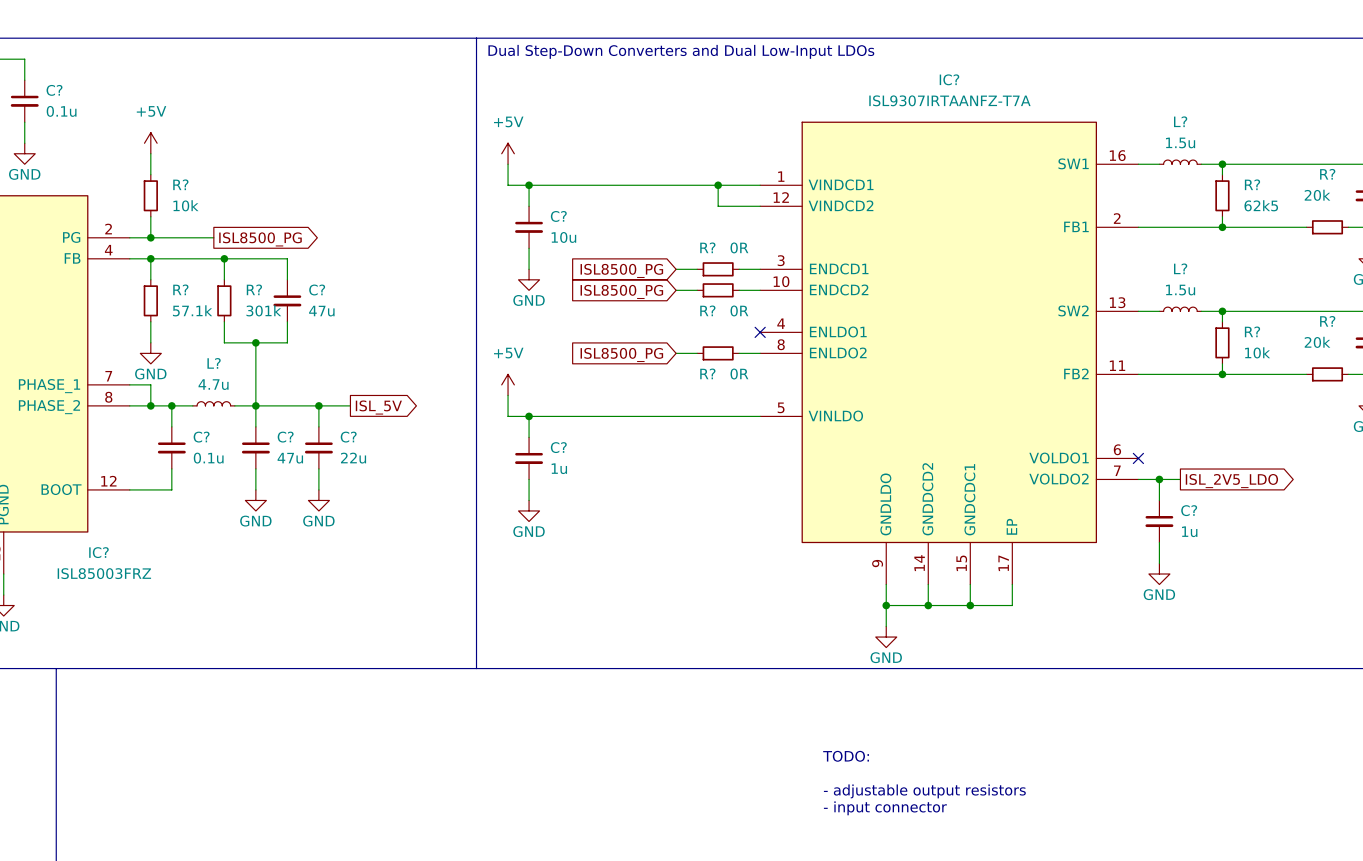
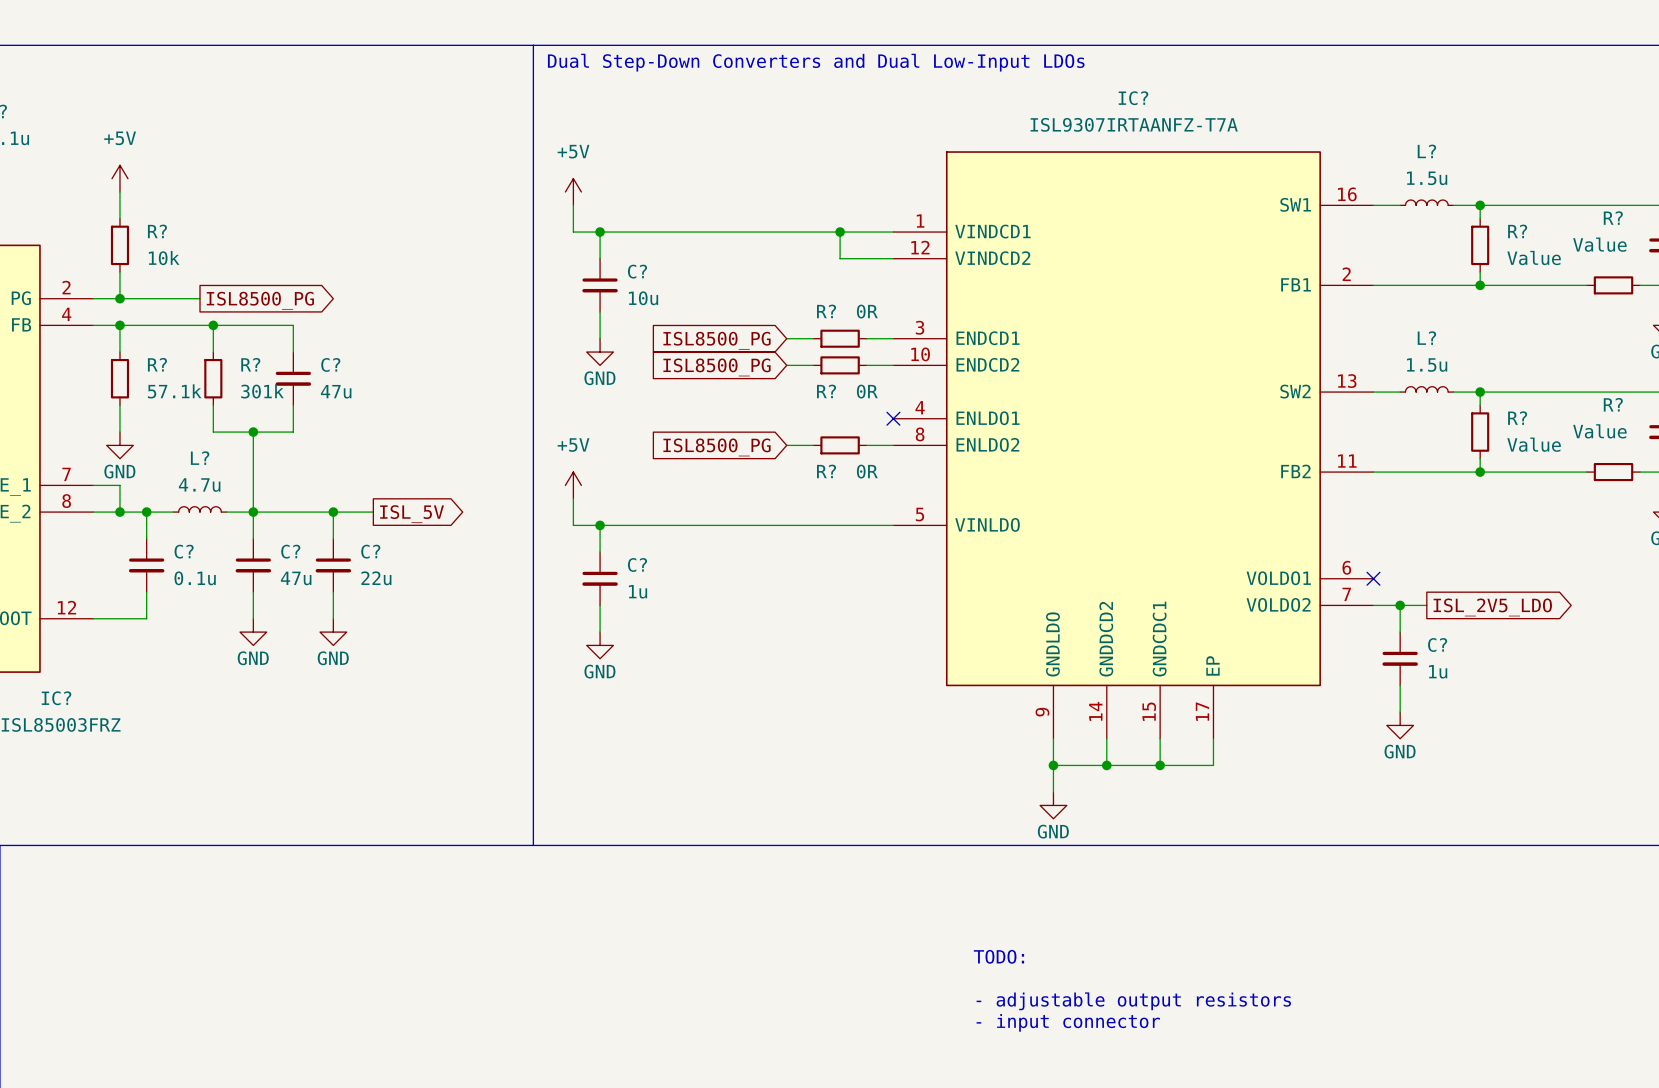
R? value: 20k (1317, 195) -> Value (1599, 244)
R? value: 62k5 (1261, 205) -> Value (1534, 258)
R? value: 20k (1317, 342) -> Value (1599, 431)
R? value: 10k (1257, 352) -> Value (1534, 444)

